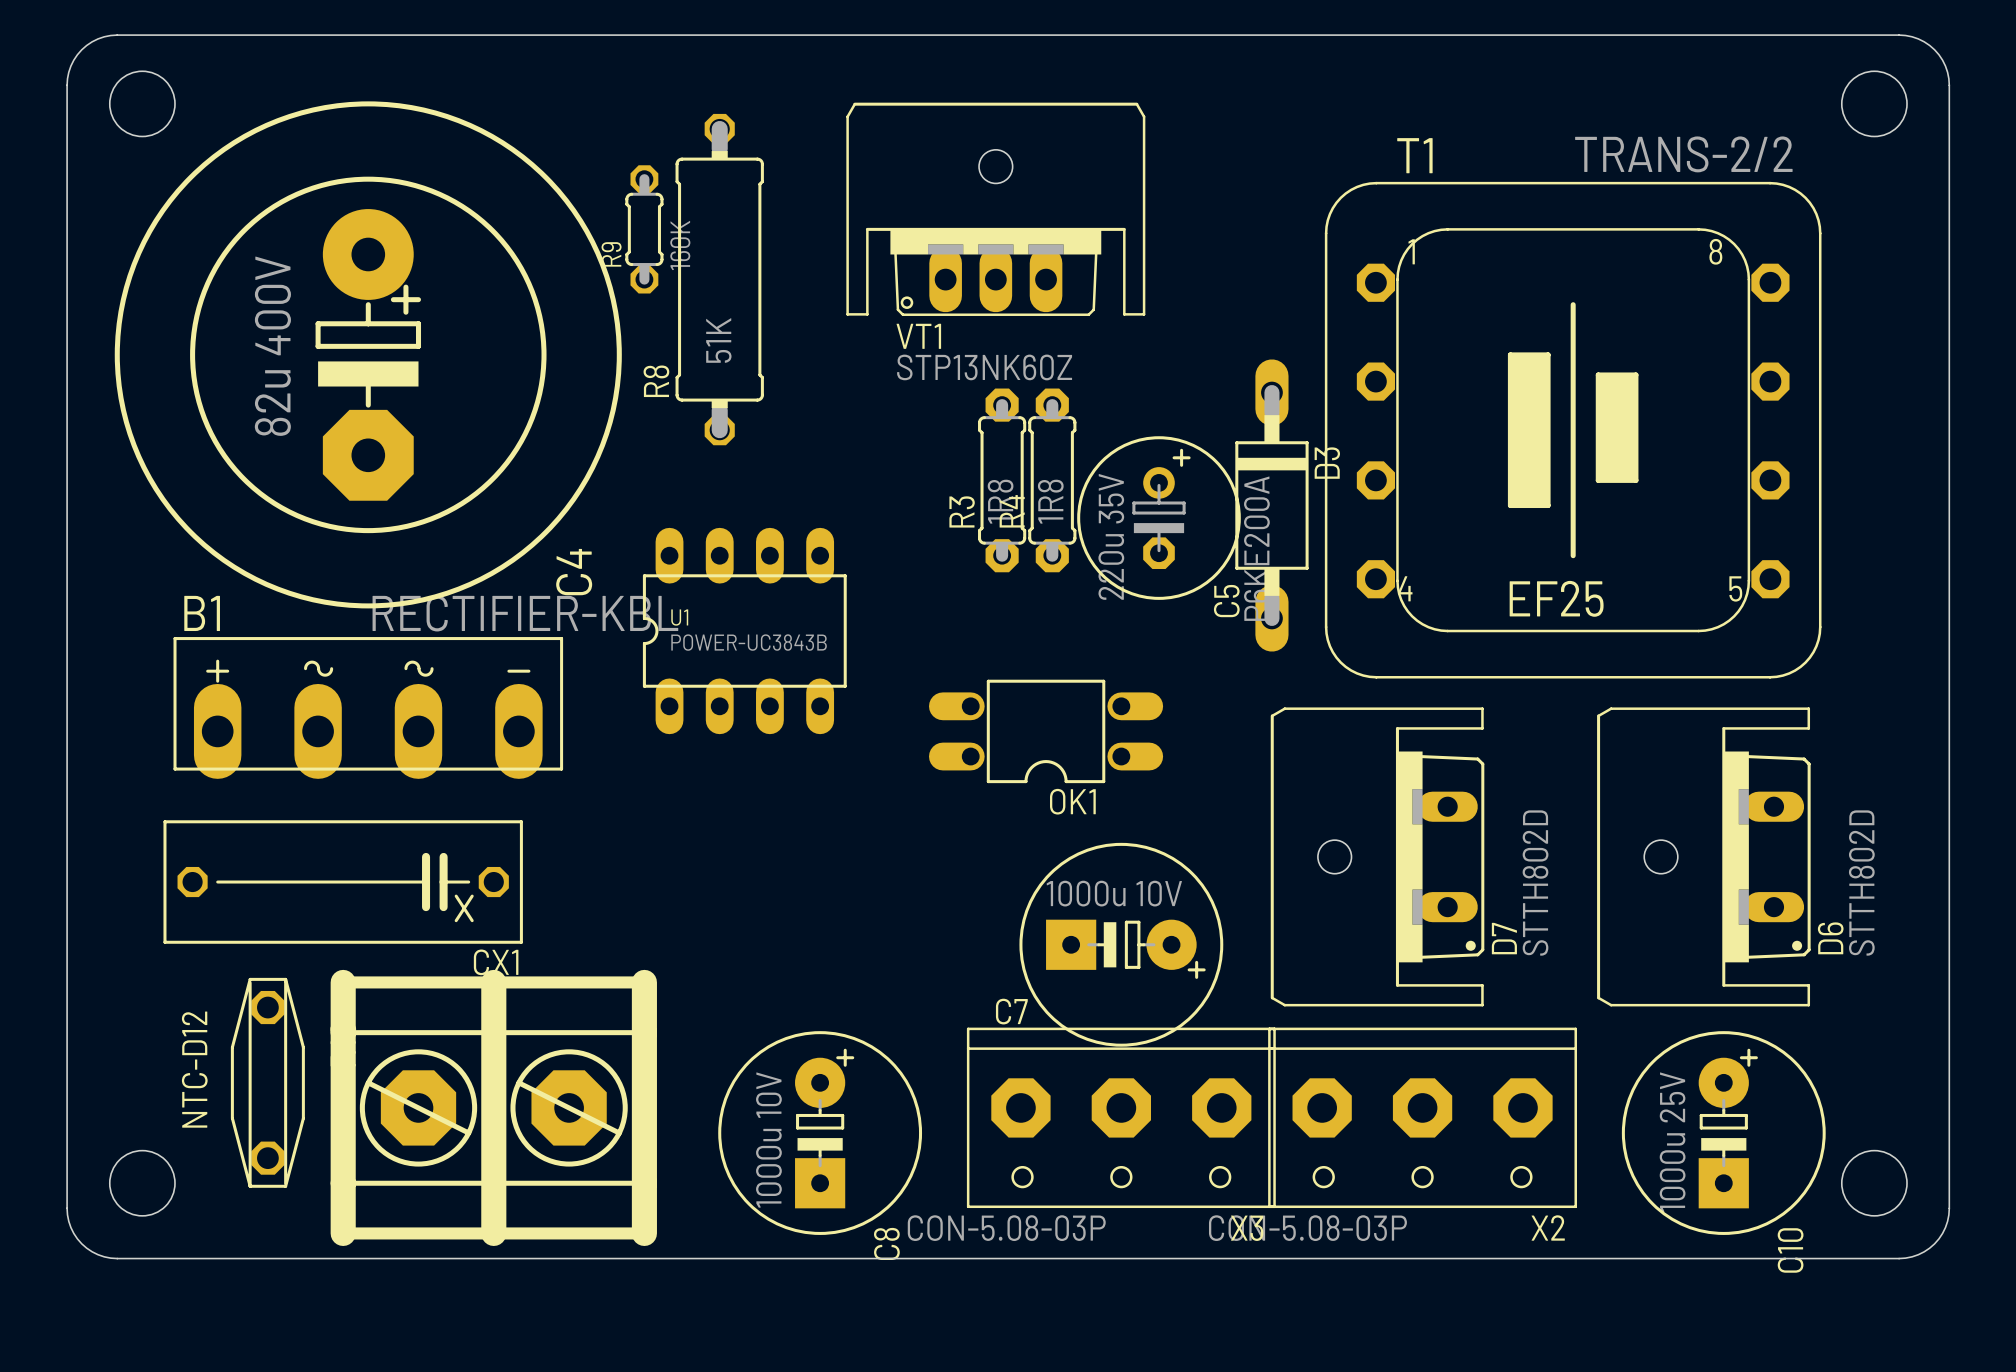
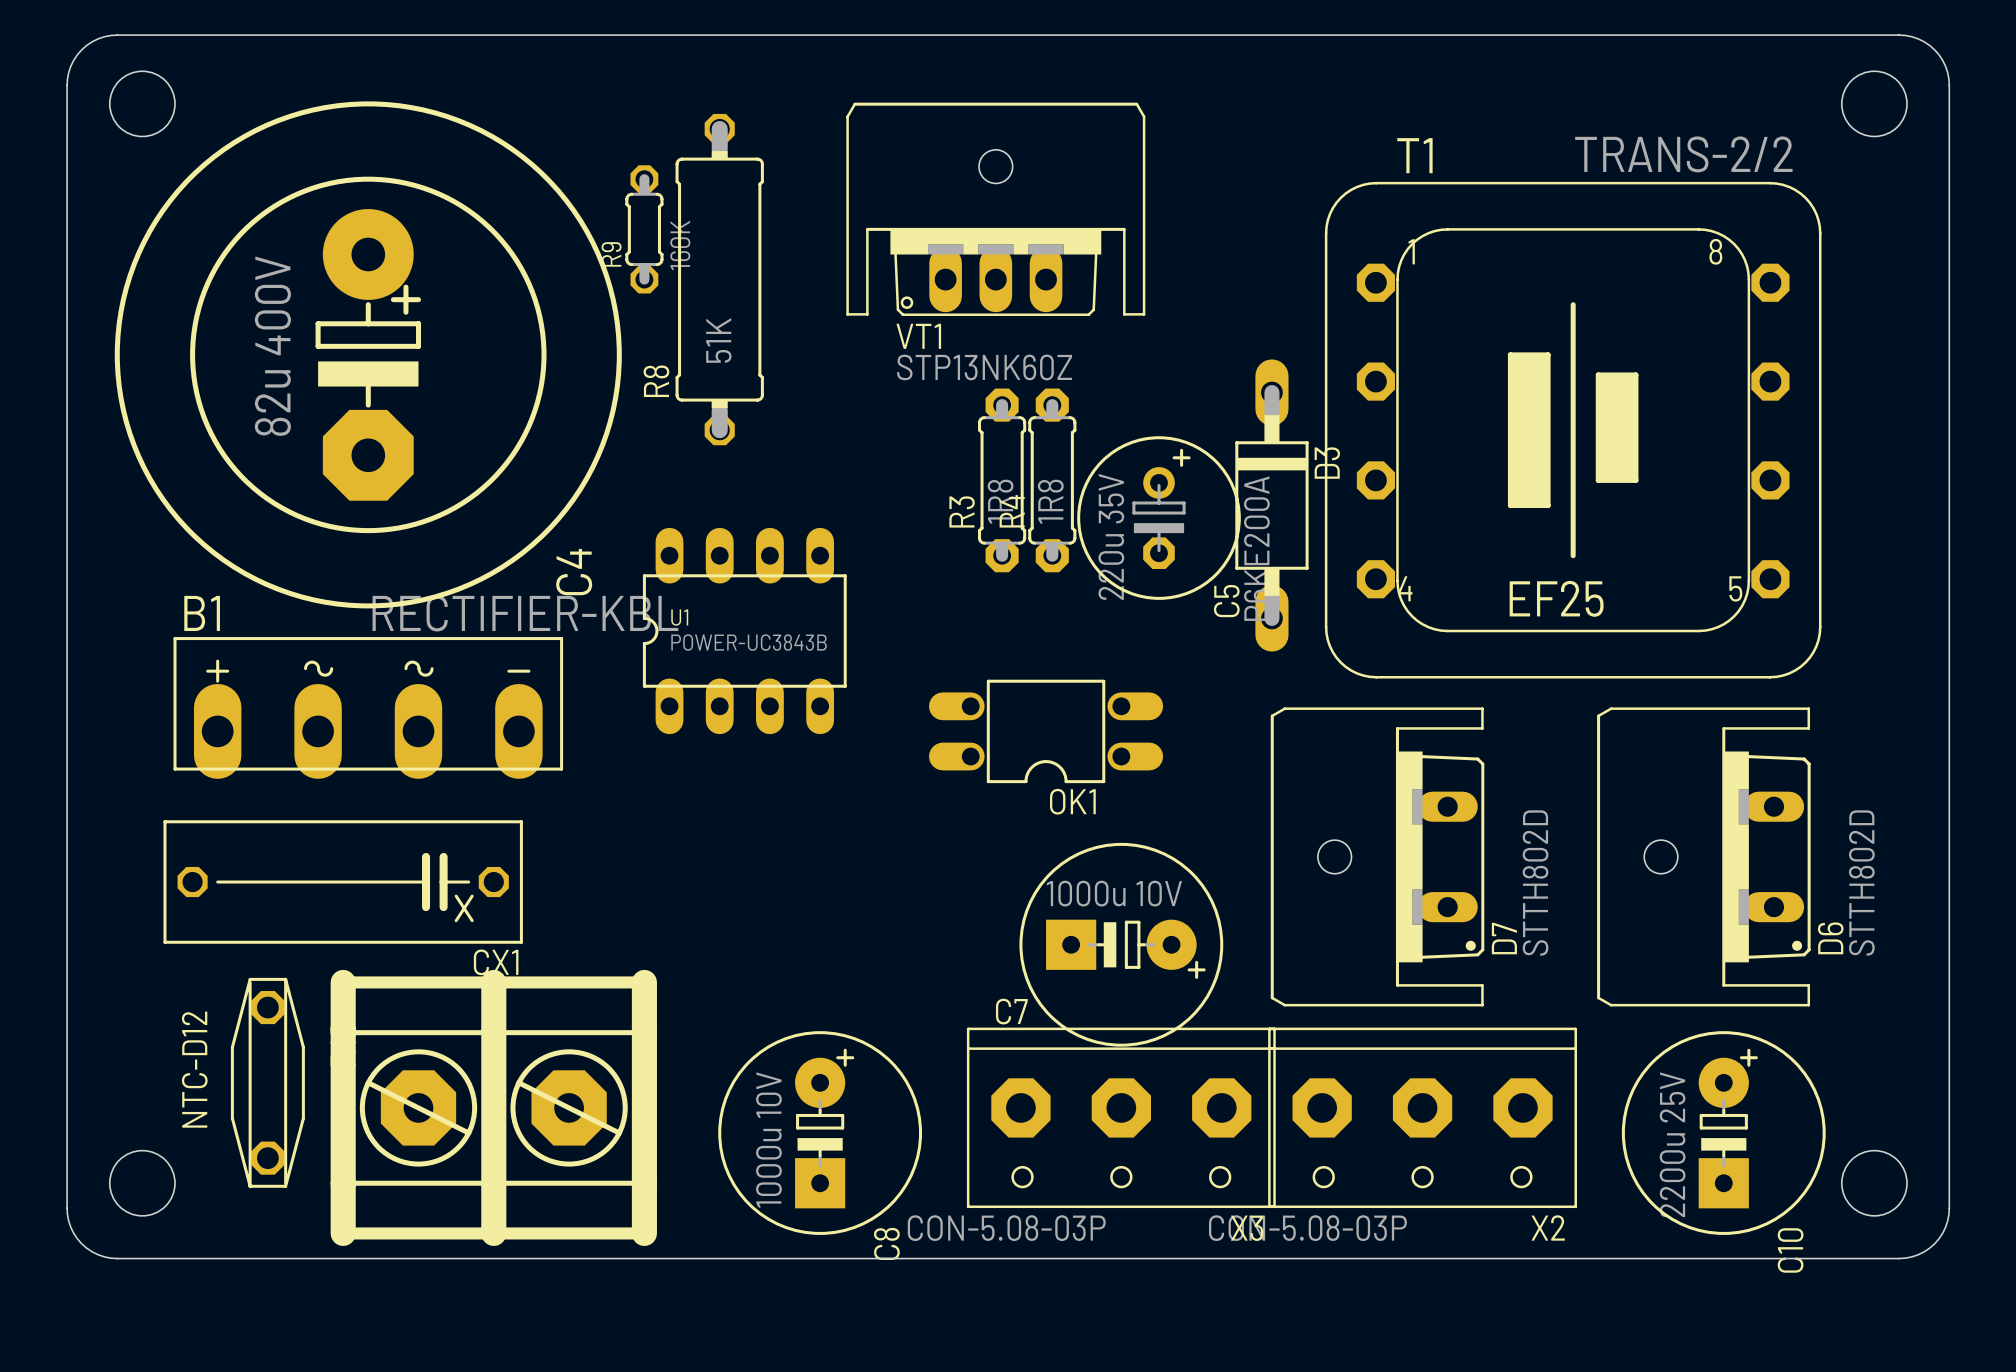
C10 value: 1000u 25V (1672, 1142) -> 2200u 25V (1672, 1144)

